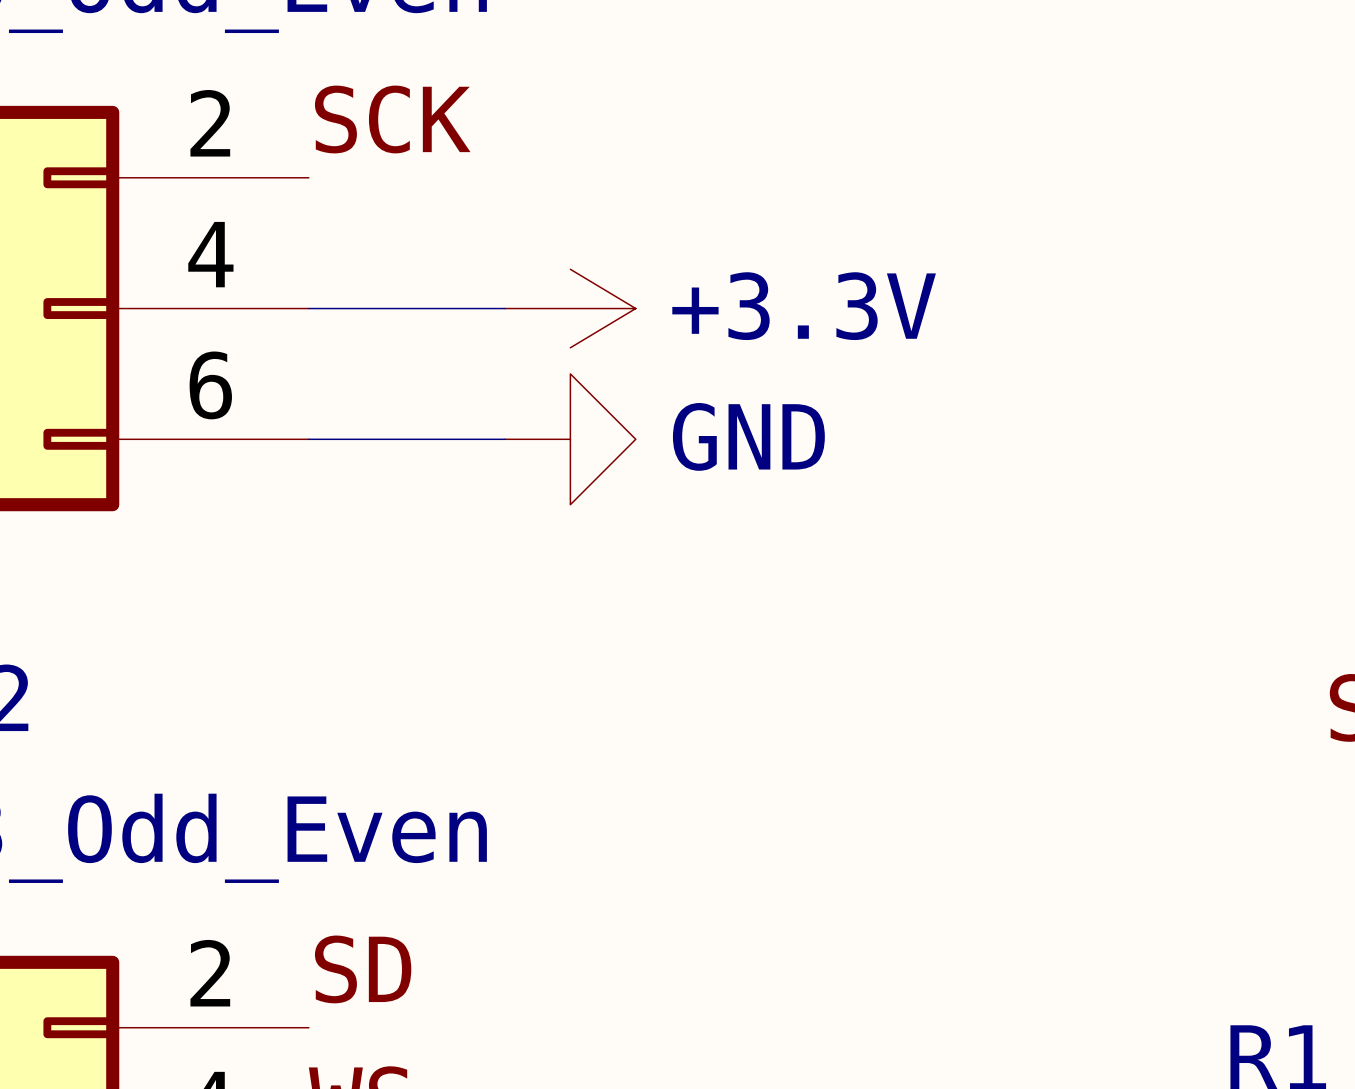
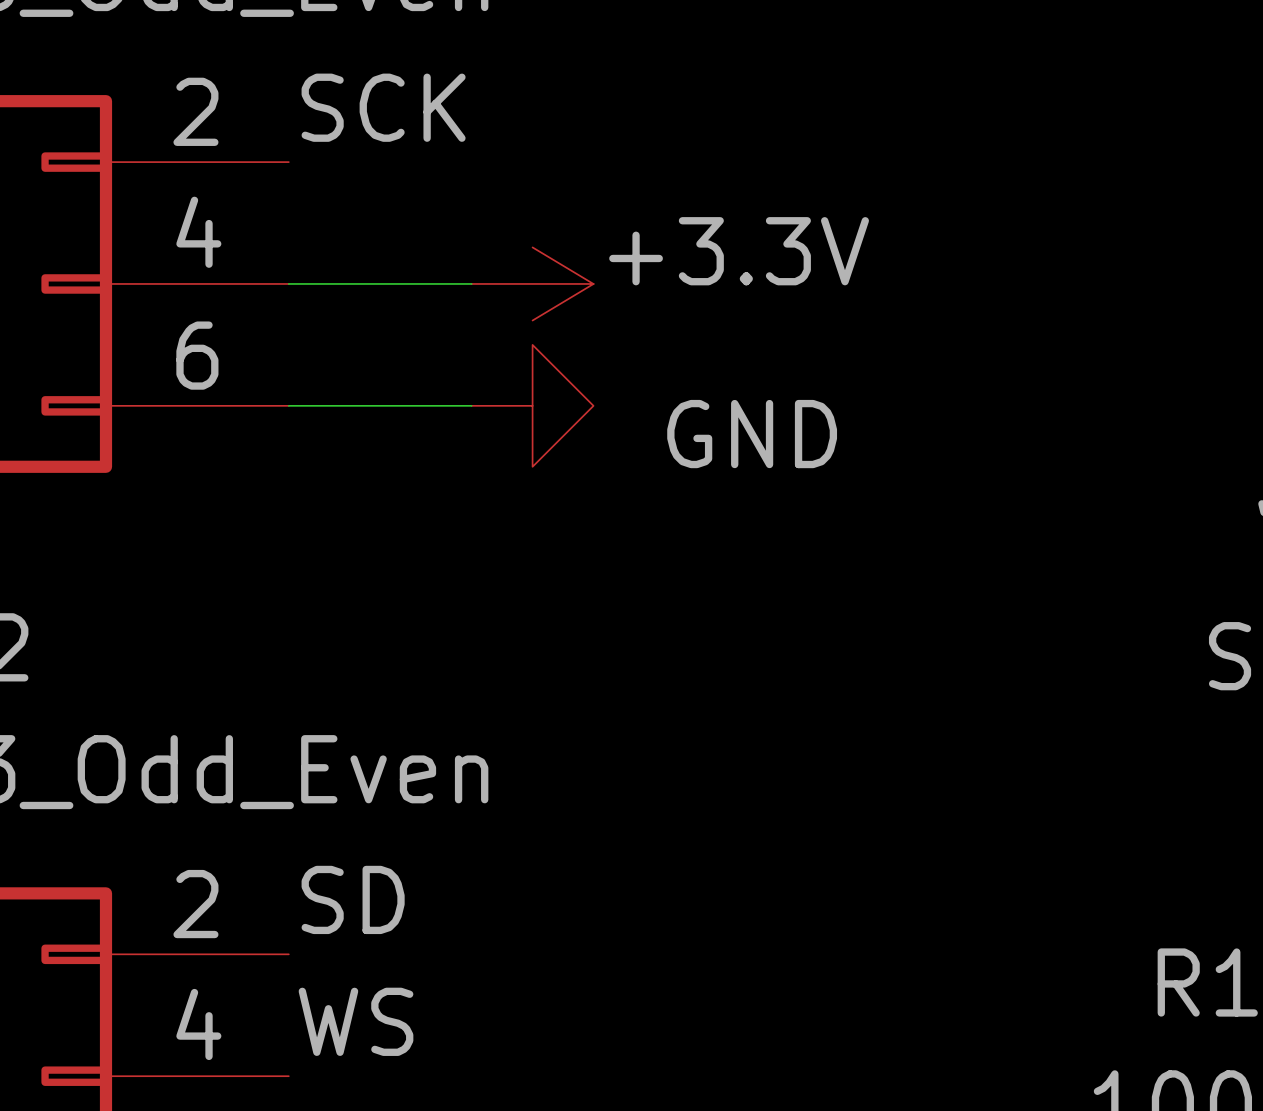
power symbol text position: +3.3V (804, 306) -> +3.3V (739, 251)
power symbol text position: GND (748, 436) -> GND (752, 434)

